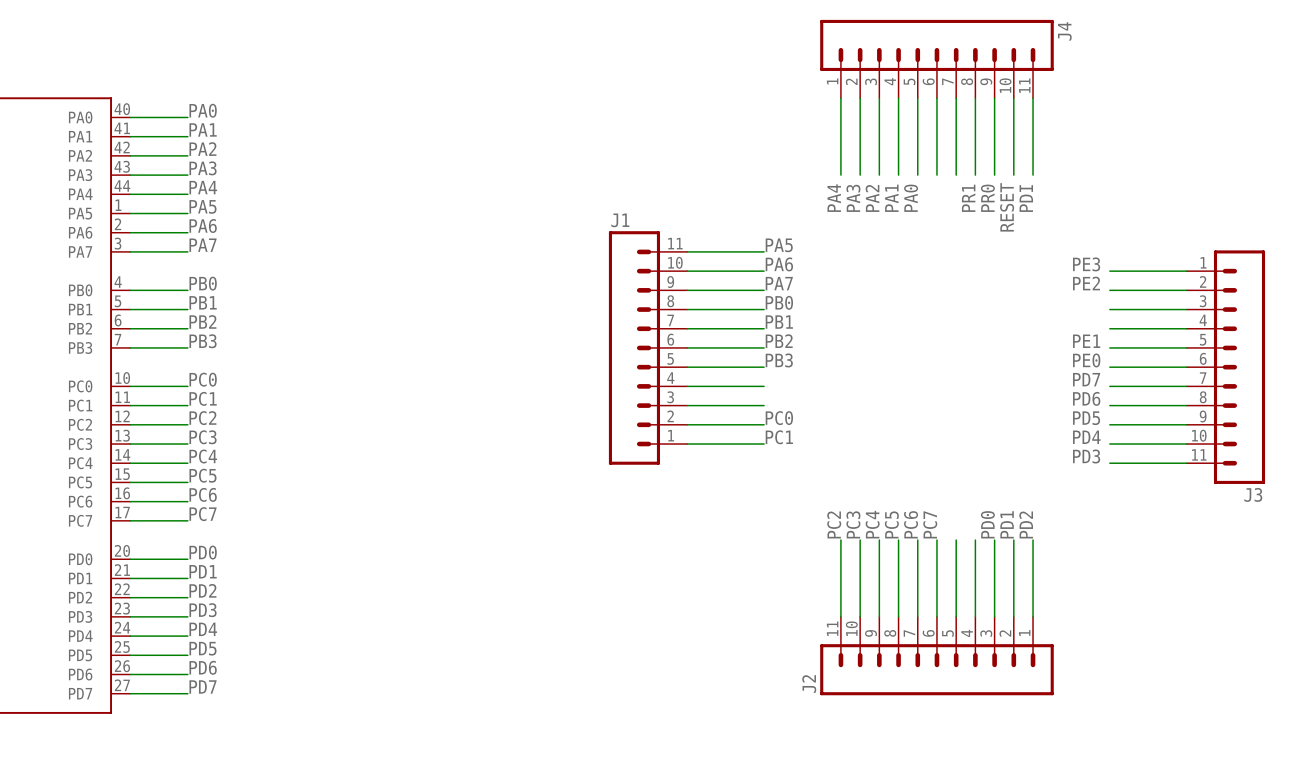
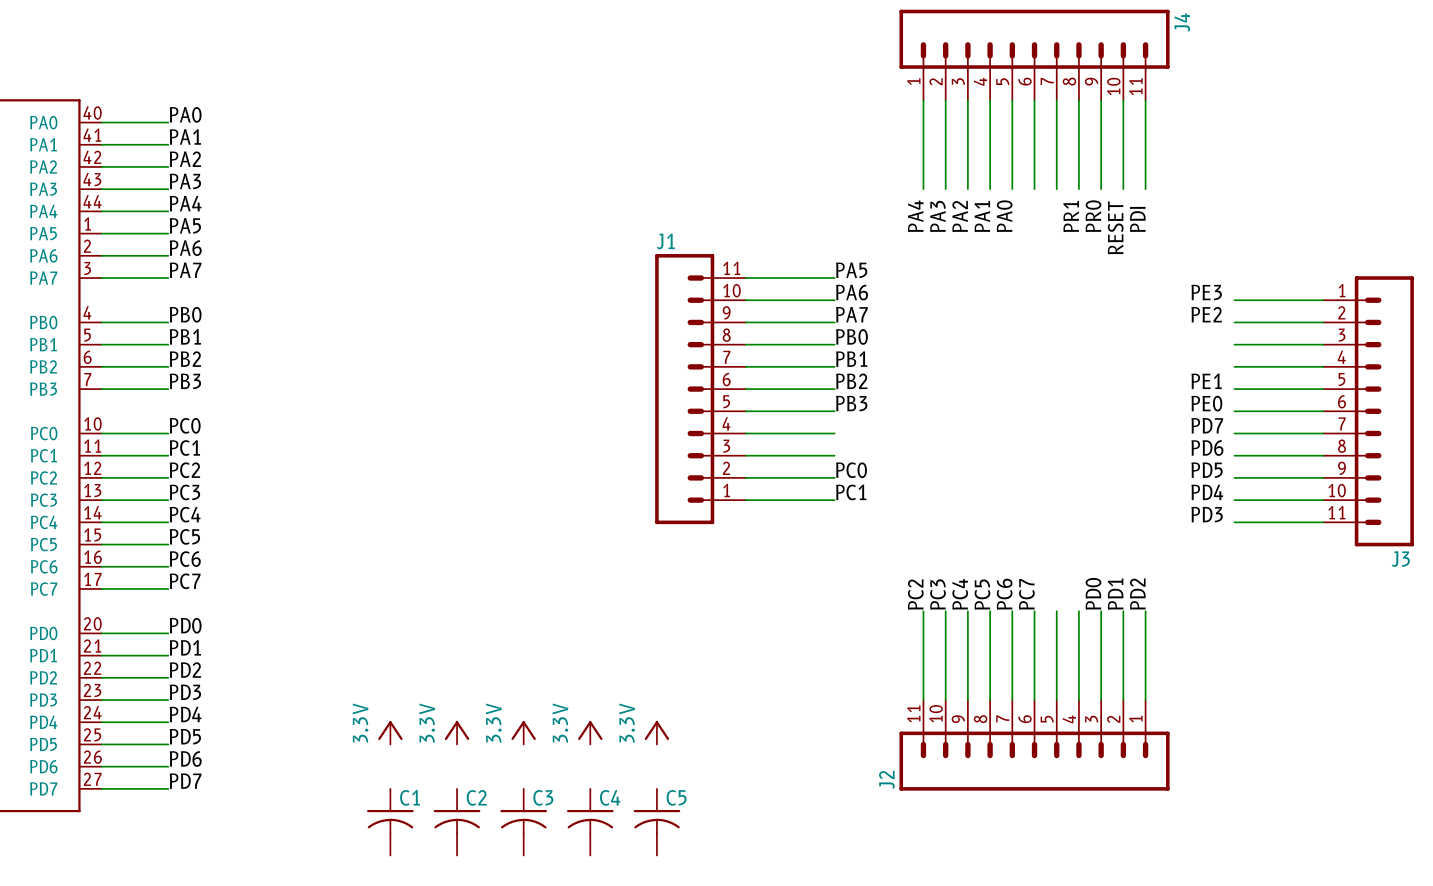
power symbol: none -> 3.3V (390, 732)
power symbol: none -> 3.3V (457, 732)
power symbol: none -> 3.3V (523, 732)
power symbol: none -> 3.3V (590, 732)
power symbol: none -> 3.3V (656, 732)
C1: none -> (390, 822)
C2: none -> (457, 822)
C3: none -> (523, 822)
C4: none -> (590, 822)
C5: none -> (656, 822)

